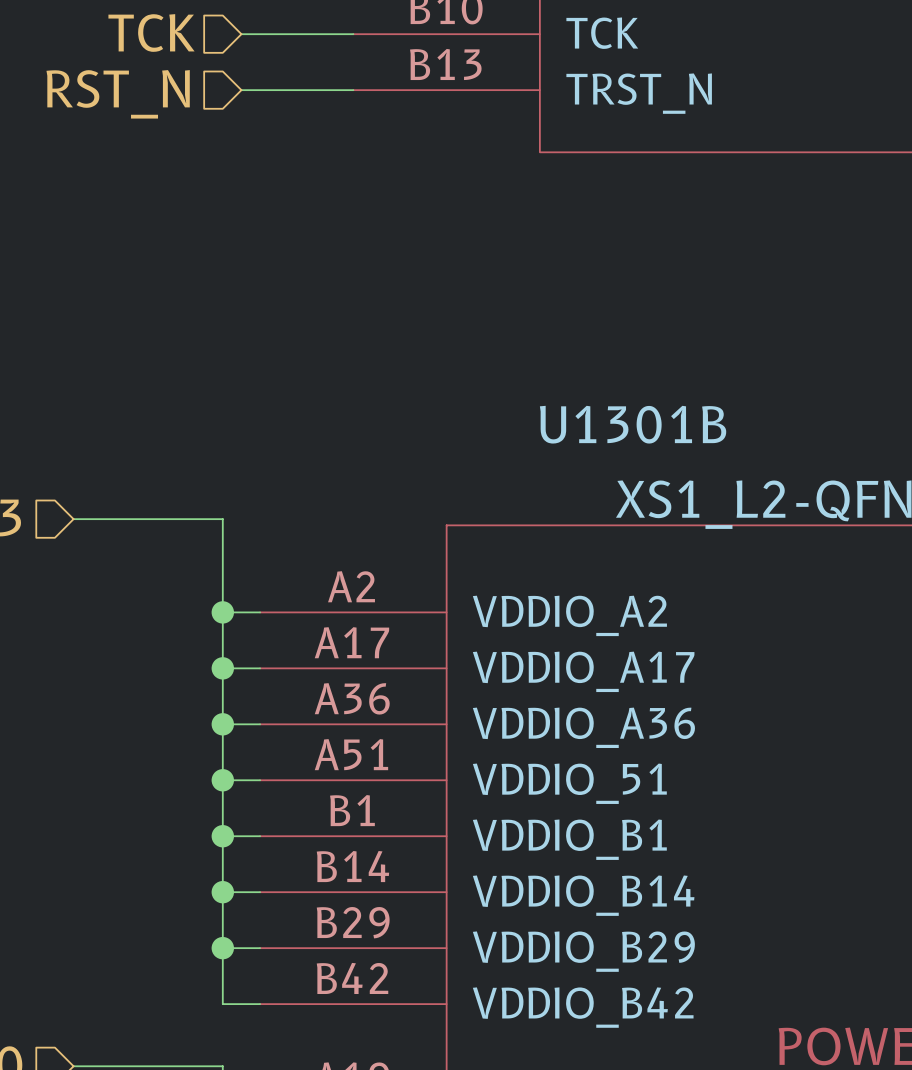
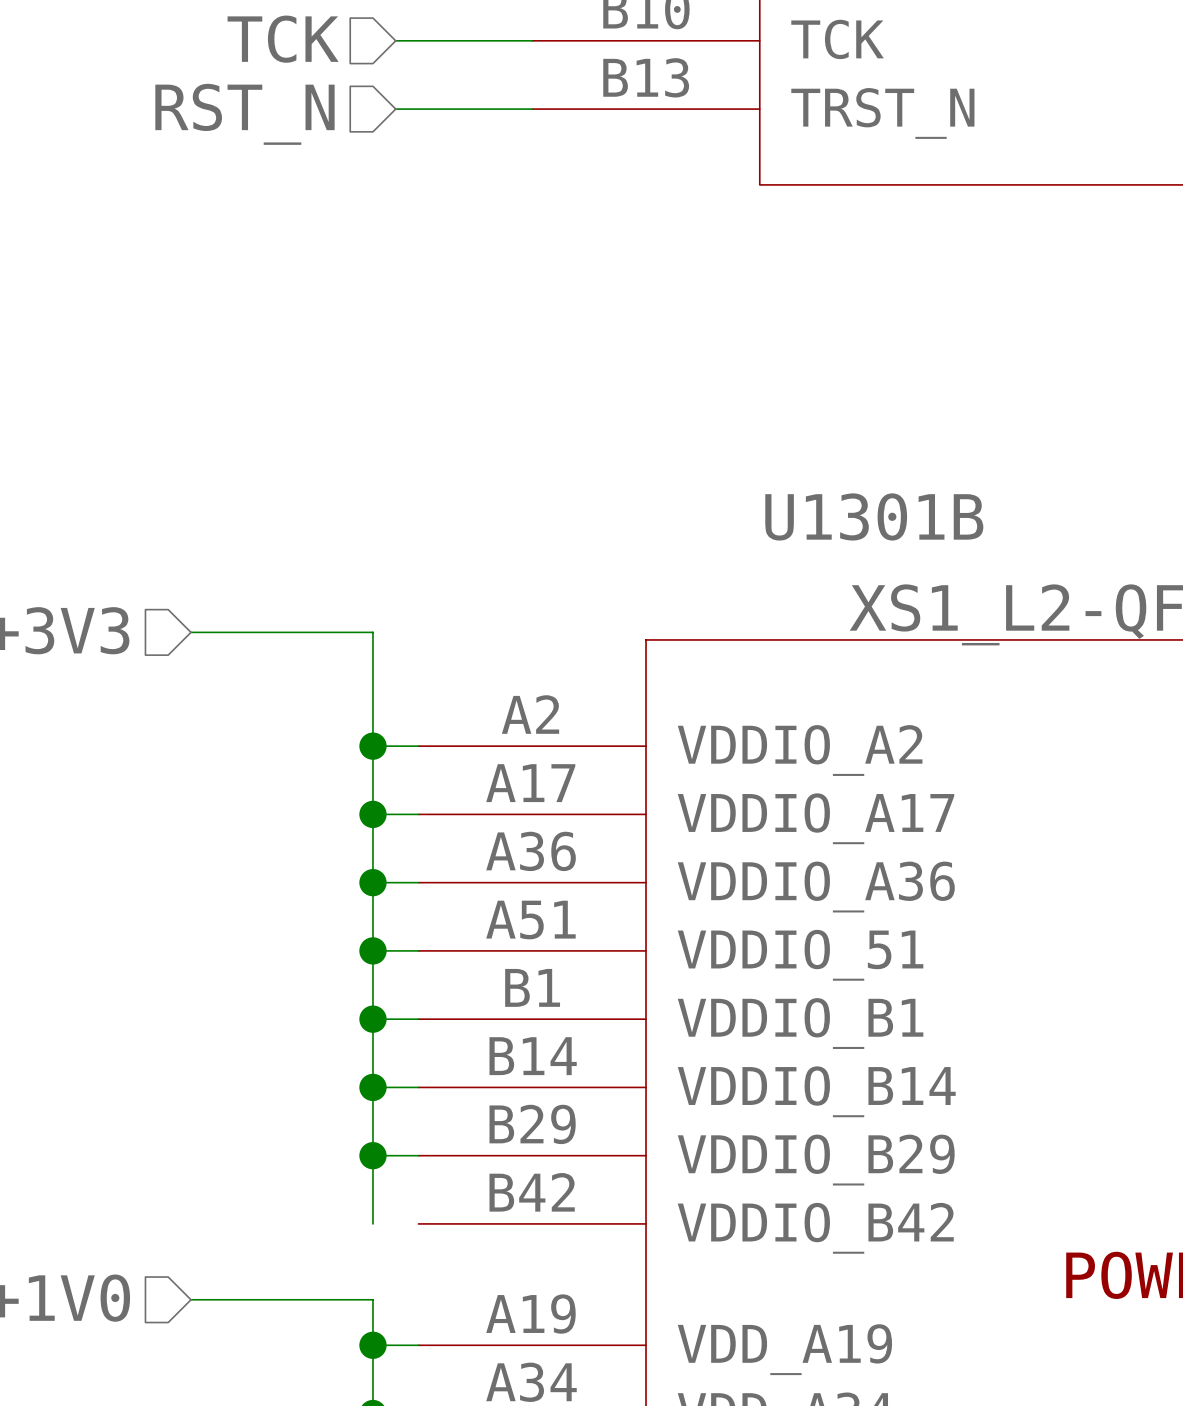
wire: (222, 1004) (260, 1004) -> none

